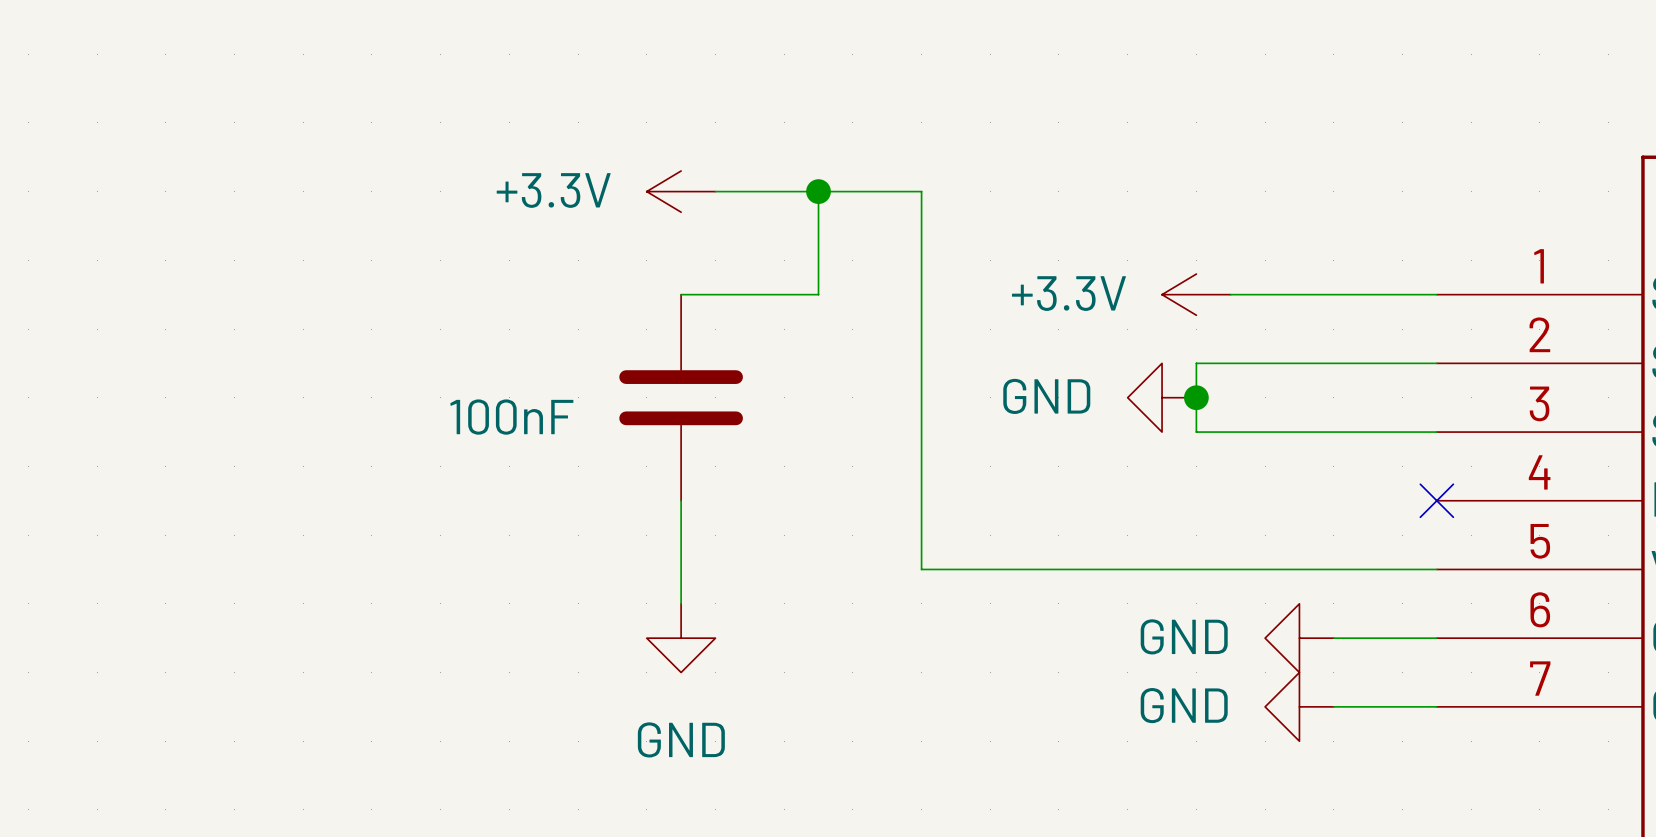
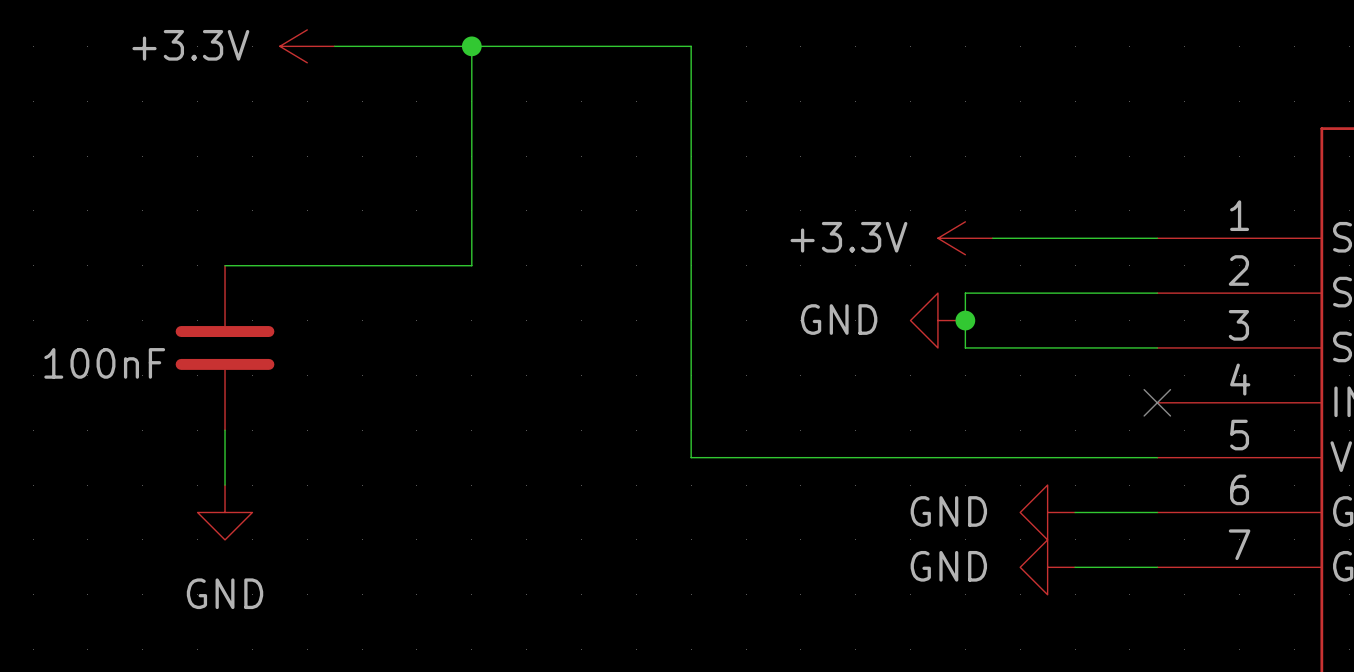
wire: none -> (471, 46) (471, 265) (225, 265)
junction: none -> (471, 46)
power symbol position: +3.3V (681, 191) -> +3.3V (307, 46)
wire: (715, 191) (921, 191) (921, 569) -> (334, 46) (691, 46) (691, 457) (746, 457)
wire: (818, 191) (818, 294) (681, 294) -> none
junction: (818, 191) -> none
part position: (681, 397) -> (225, 347)
wire: (681, 500) (681, 603) -> none
wire: none -> (225, 430) (225, 485)
power symbol position: GND (681, 638) -> GND (225, 512)

